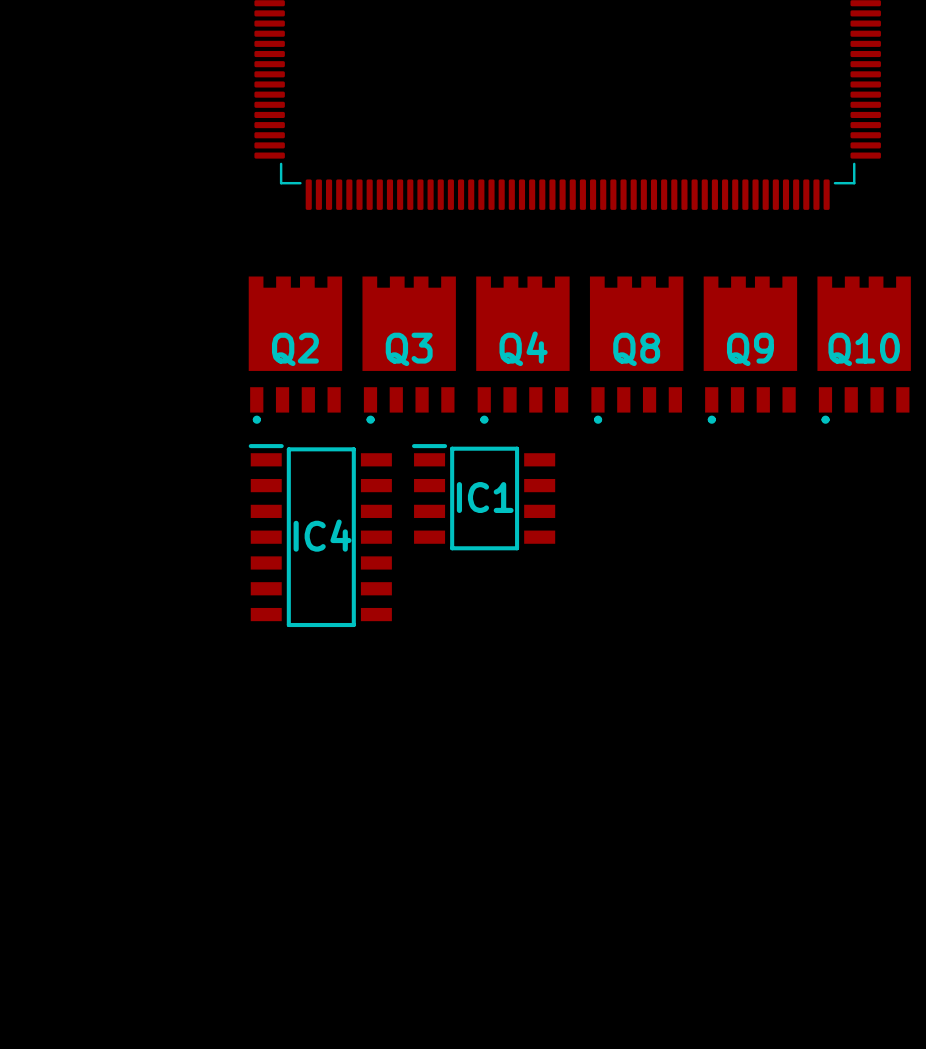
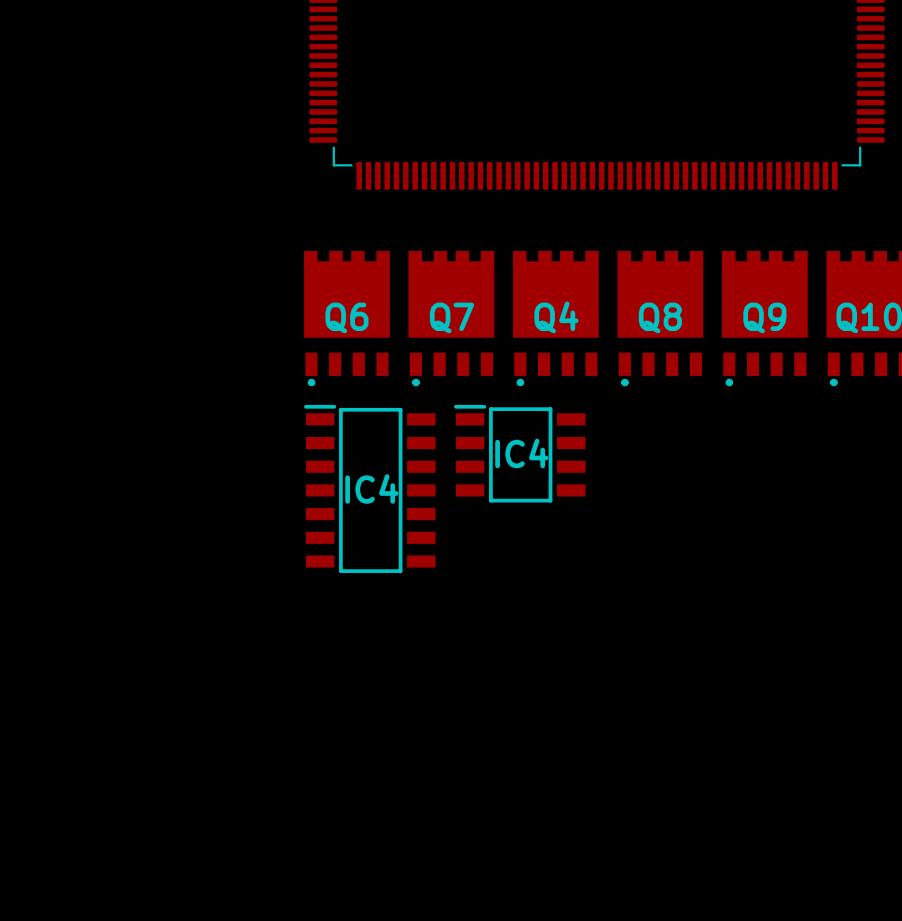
Q2 name: Q2 (295, 349) -> Q6 (346, 317)
Q3 name: Q3 (409, 349) -> Q7 (451, 317)
IC1 name: IC1 (485, 497) -> IC4 (521, 453)

